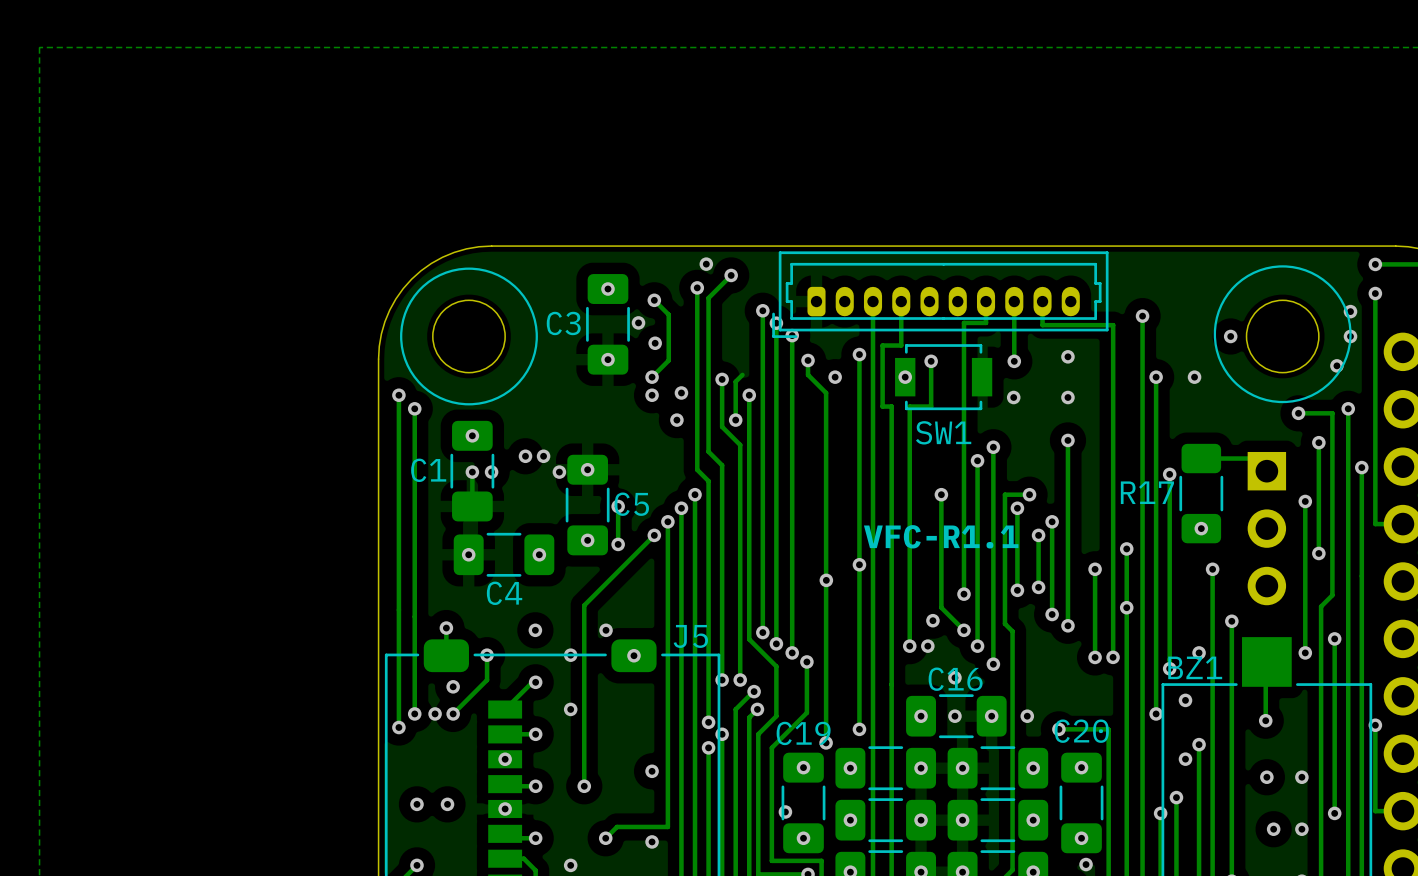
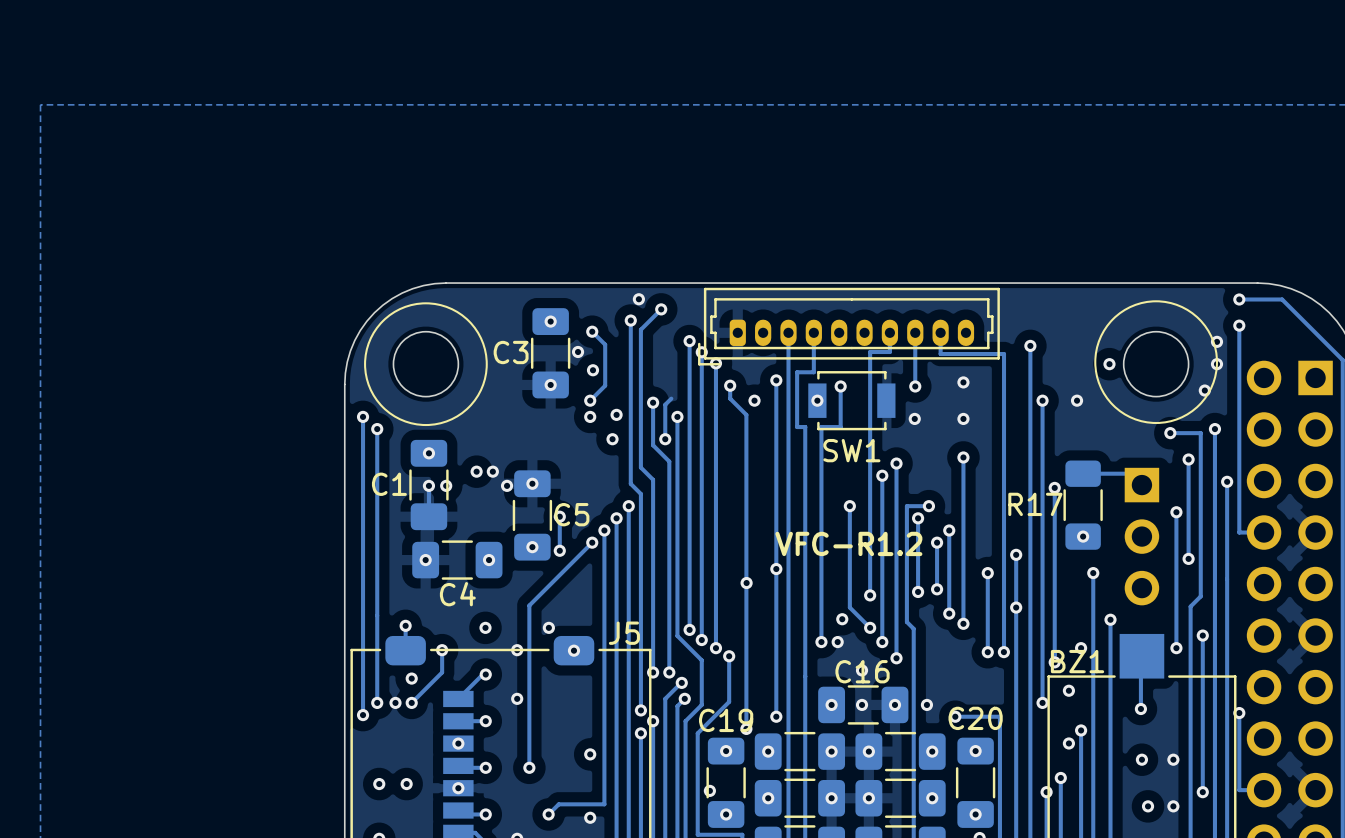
text: VFC-R1.1 (941, 536) -> VFC-R1.2 (848, 543)

